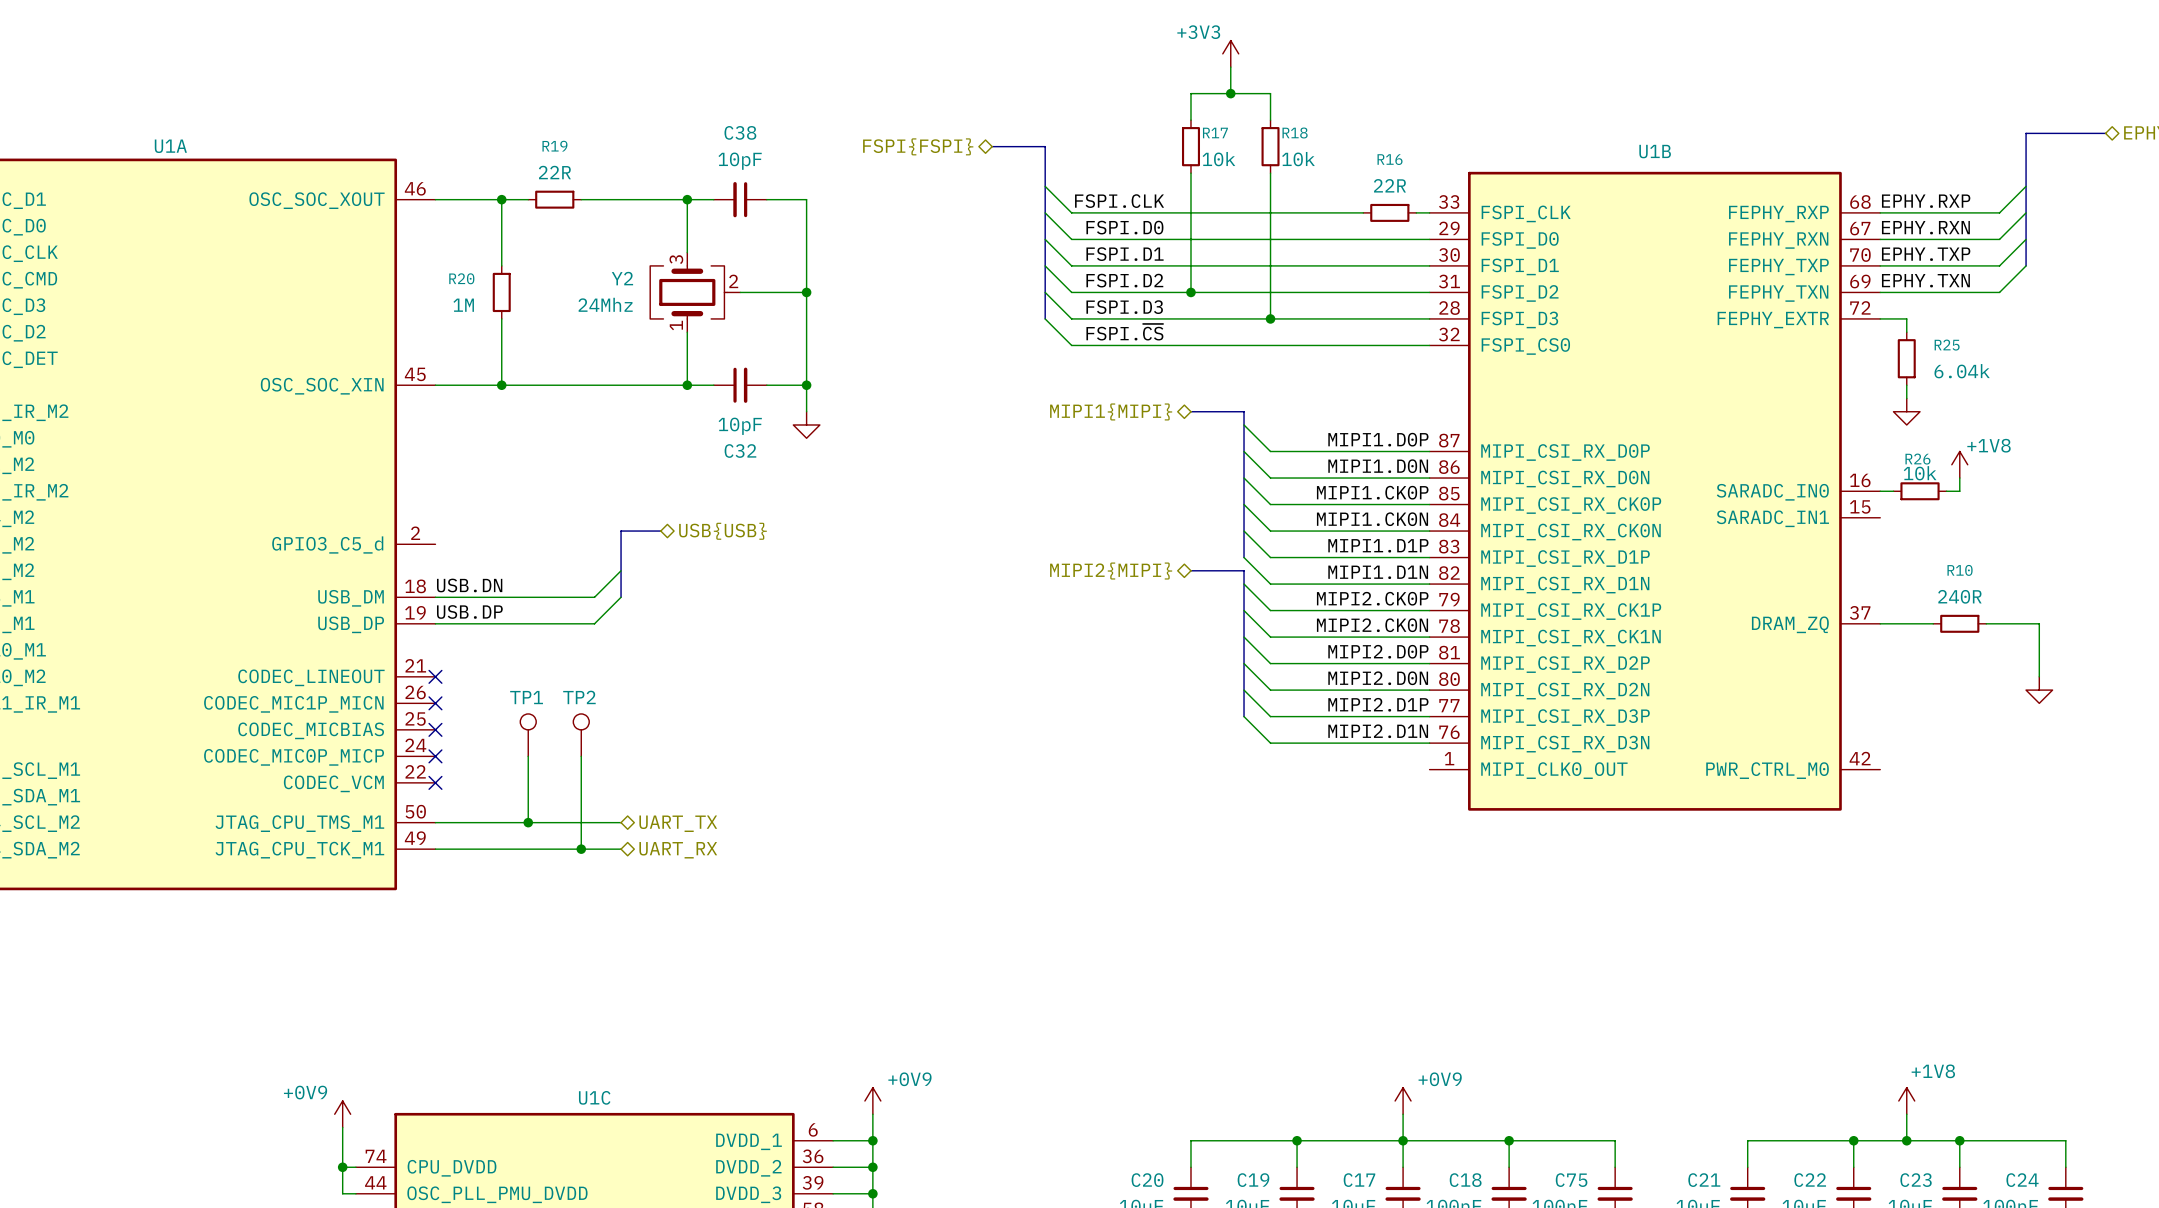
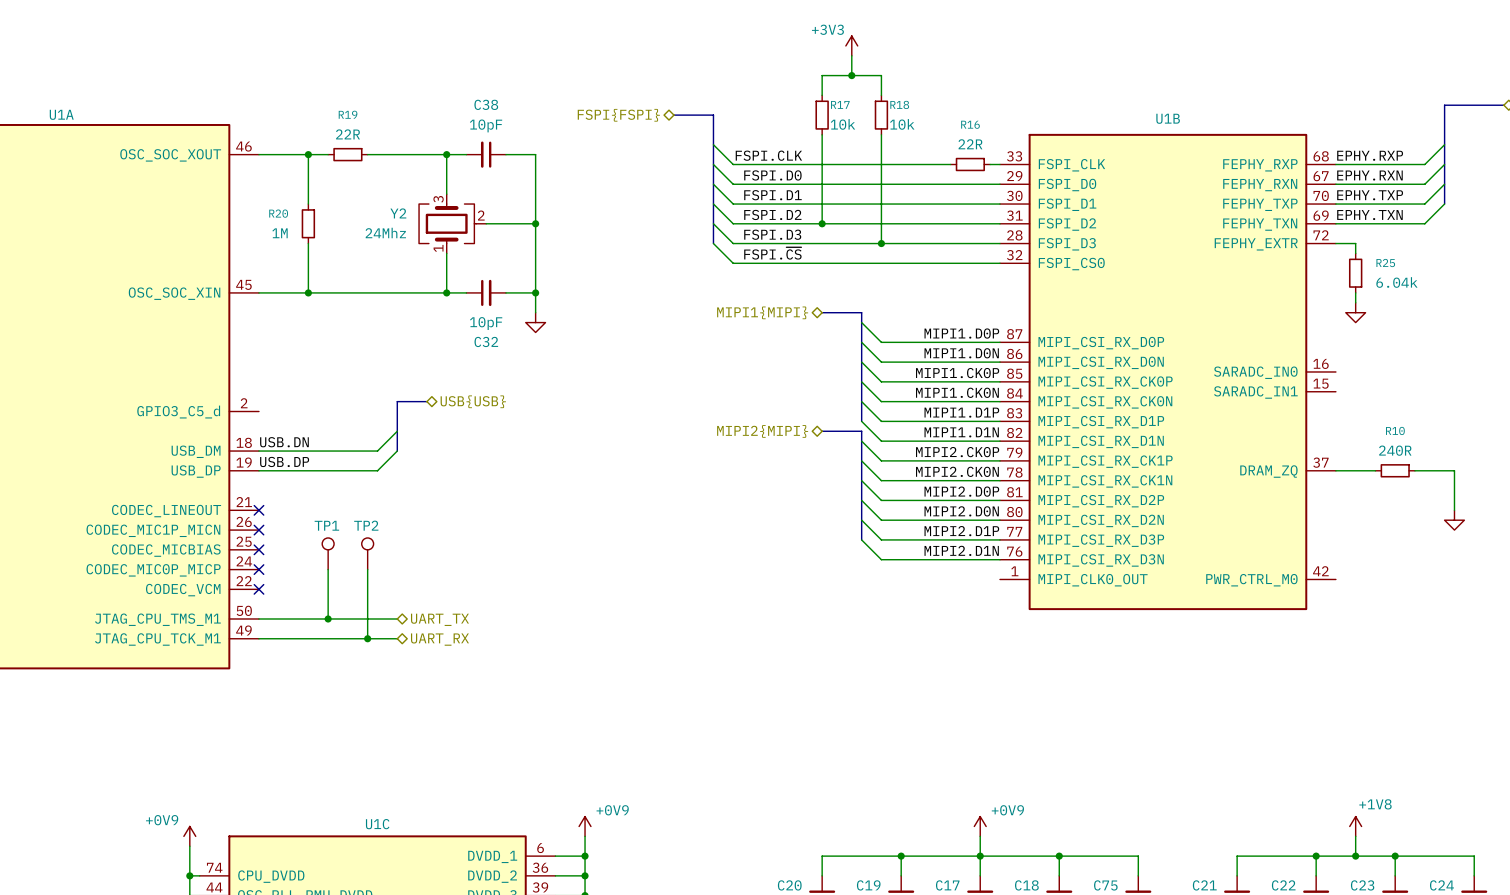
power symbol: +1V8 (1959, 464) -> none
wire: (1959, 478) (1959, 491) (1946, 491) -> none
wire: (1880, 491) (1893, 491) -> none
R26: 10k (1920, 491) -> none

